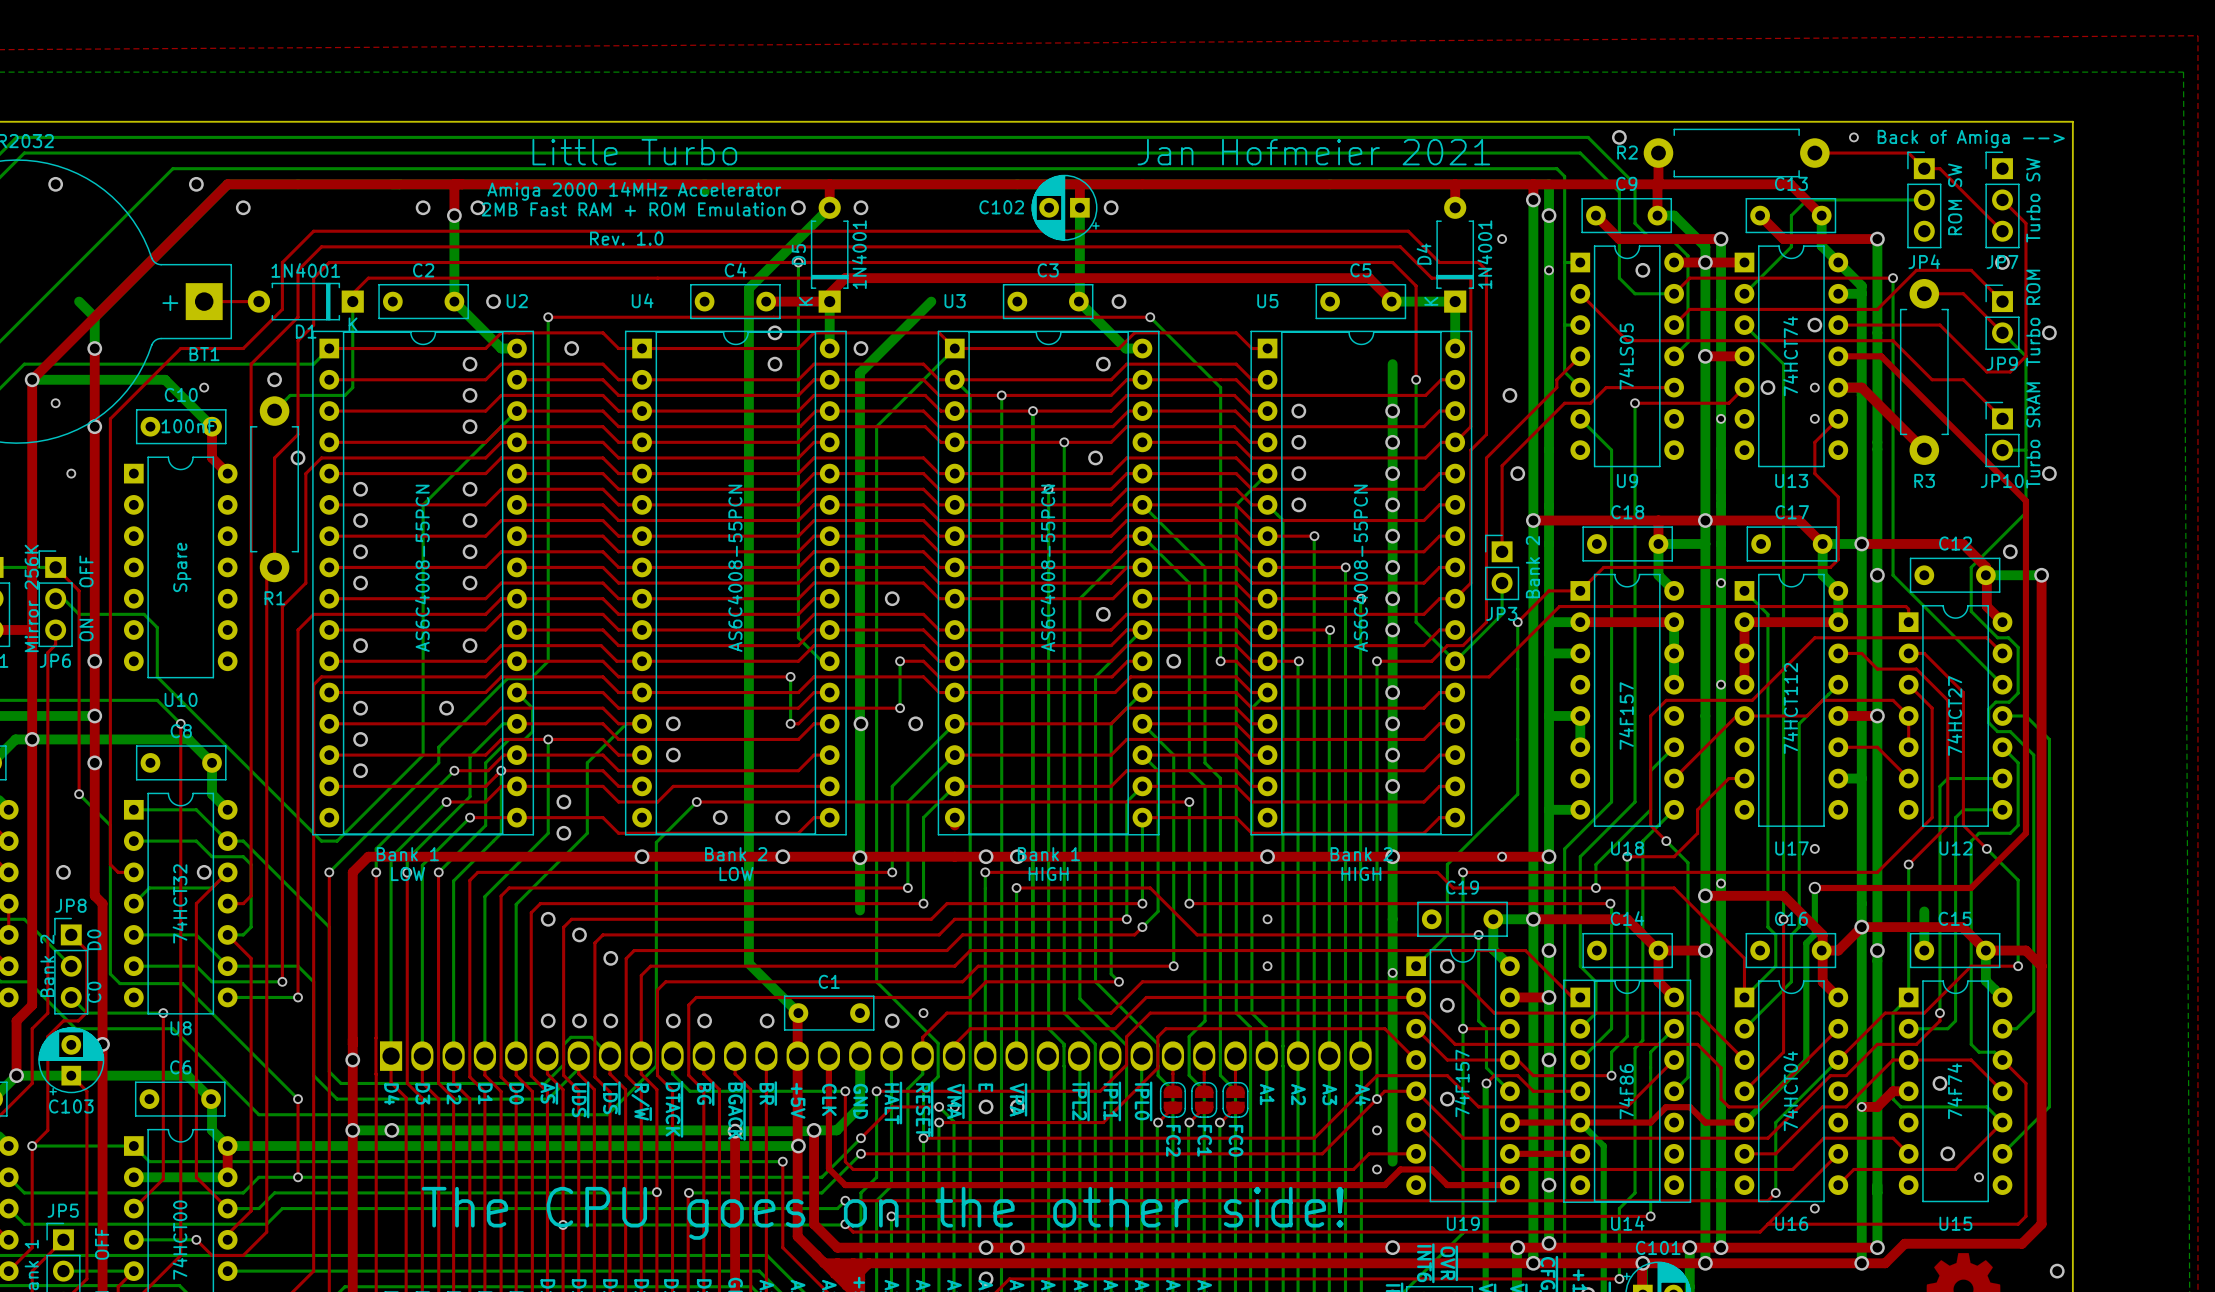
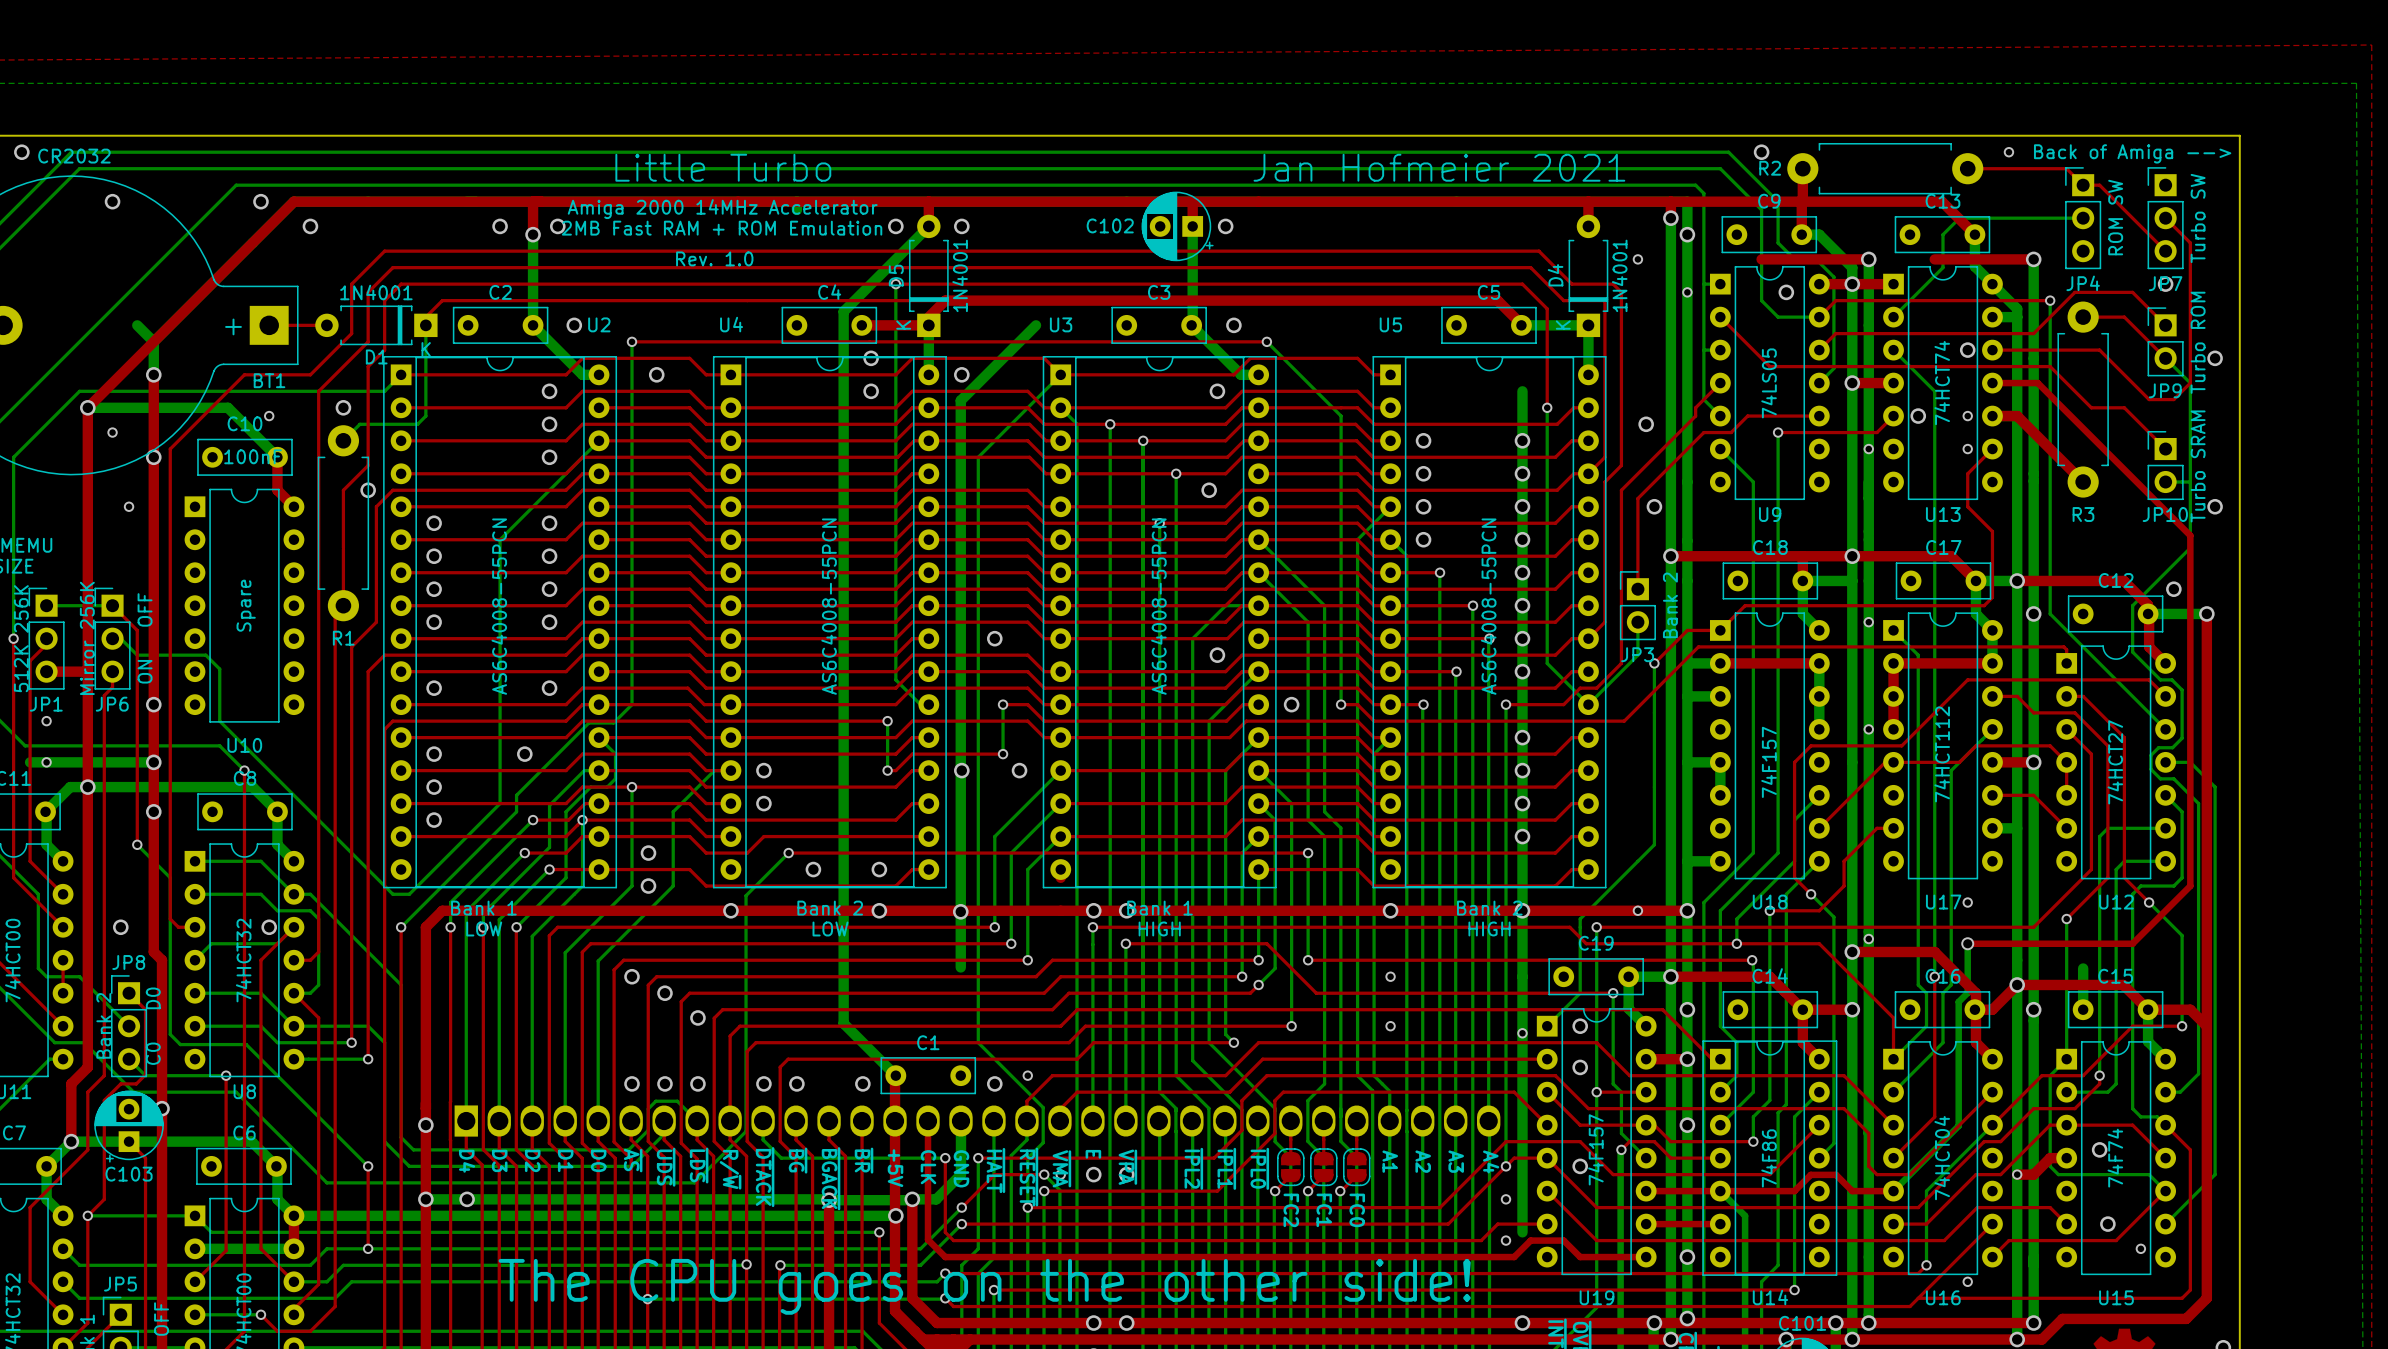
top track: (1595, 215) (1619, 239) -> none
top track: (1760, 215) (1783, 239) -> none

